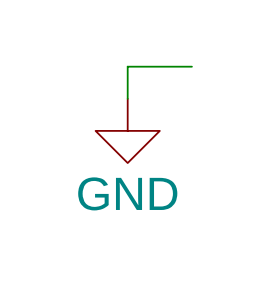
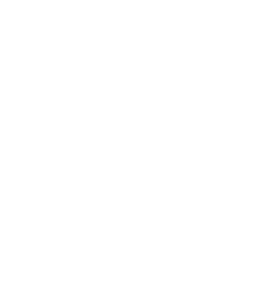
wire: (191, 66) (127, 66) (127, 98) -> none
power symbol: GND (127, 130) -> none

